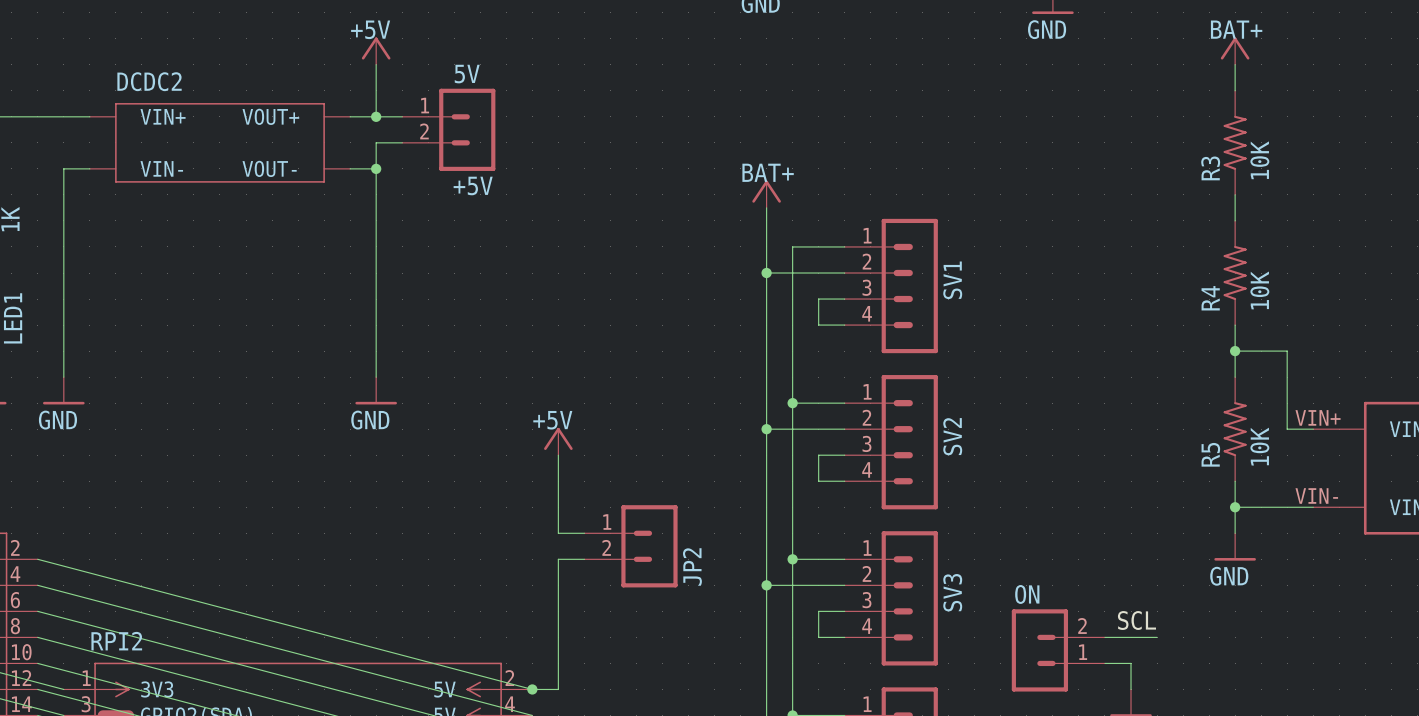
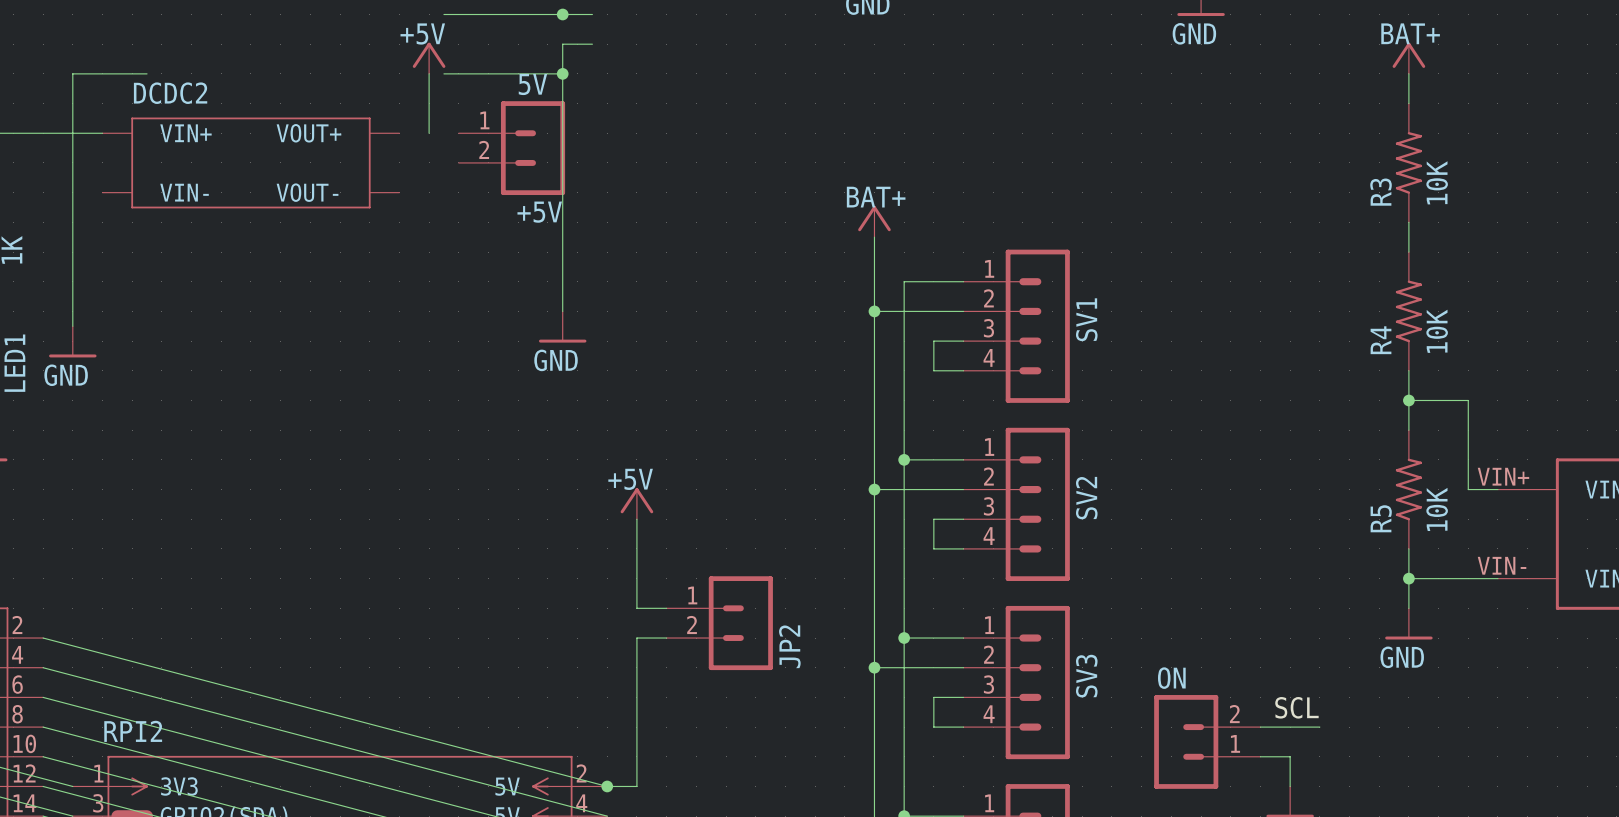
wire: none -> (443, 14) (592, 14)
junction: none -> (562, 14)
wire: none -> (443, 73) (562, 73)
junction: none -> (562, 73)
wire: (350, 116) (402, 116) -> none
junction: (376, 116) -> none
wire: (402, 142) (376, 142) (376, 377) -> (592, 44) (562, 44) (562, 311)
wire: (63, 168) (89, 168) -> (72, 192) (72, 73) (147, 73)
wire: (350, 168) (376, 168) -> none
junction: (376, 168) -> none
wire: (63, 286) (63, 377) -> none
power symbol position: GND (63, 390) -> GND (72, 341)
power symbol position: GND (376, 390) -> GND (562, 327)

